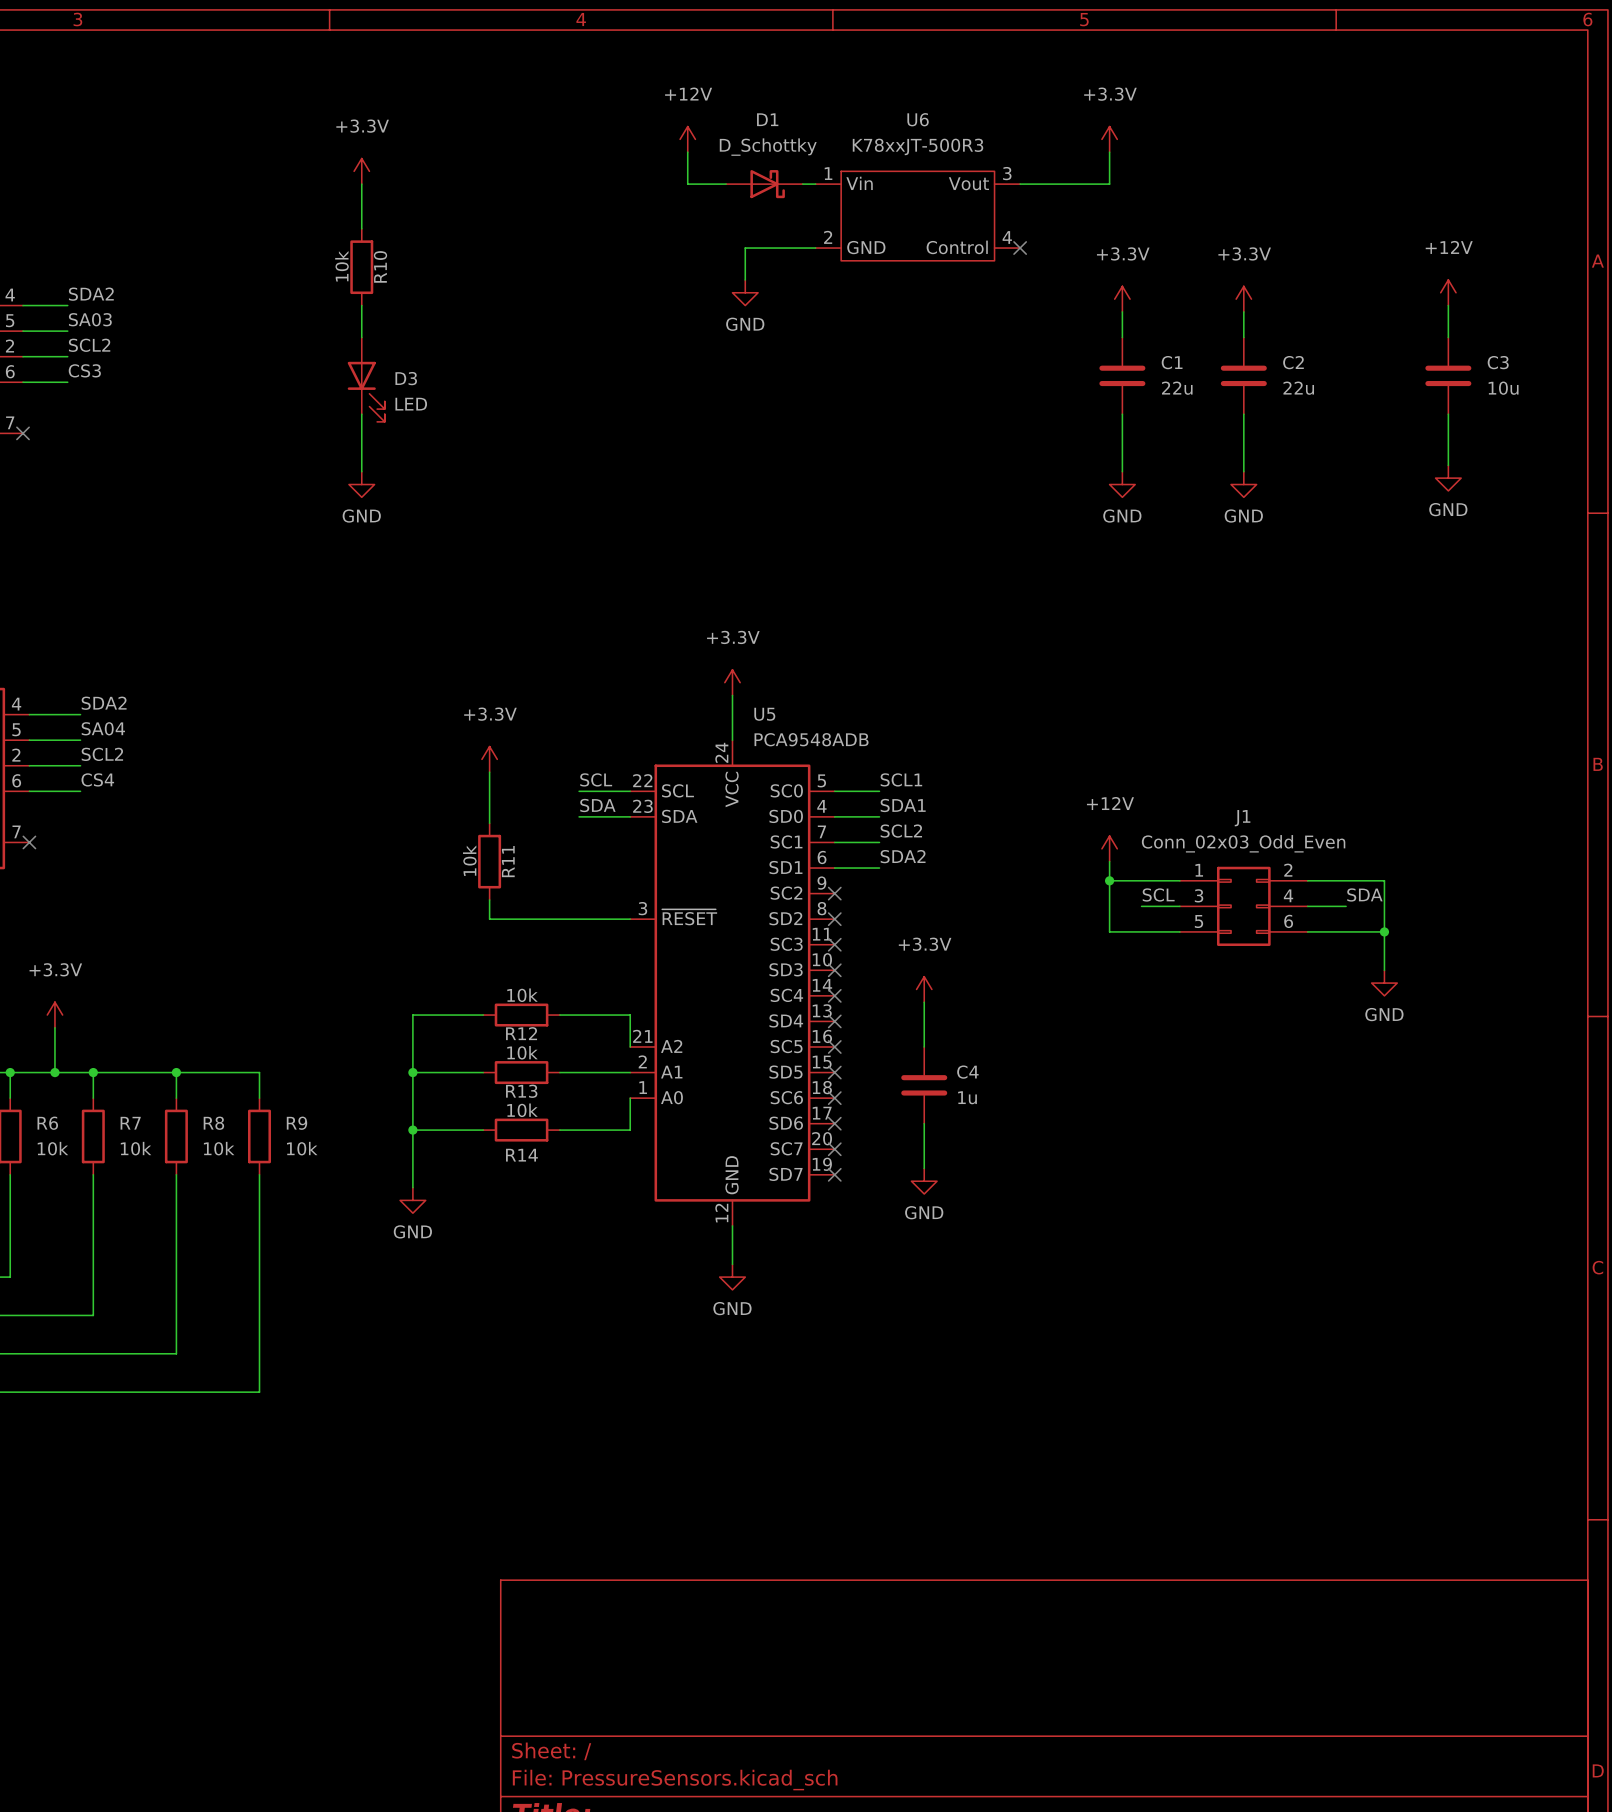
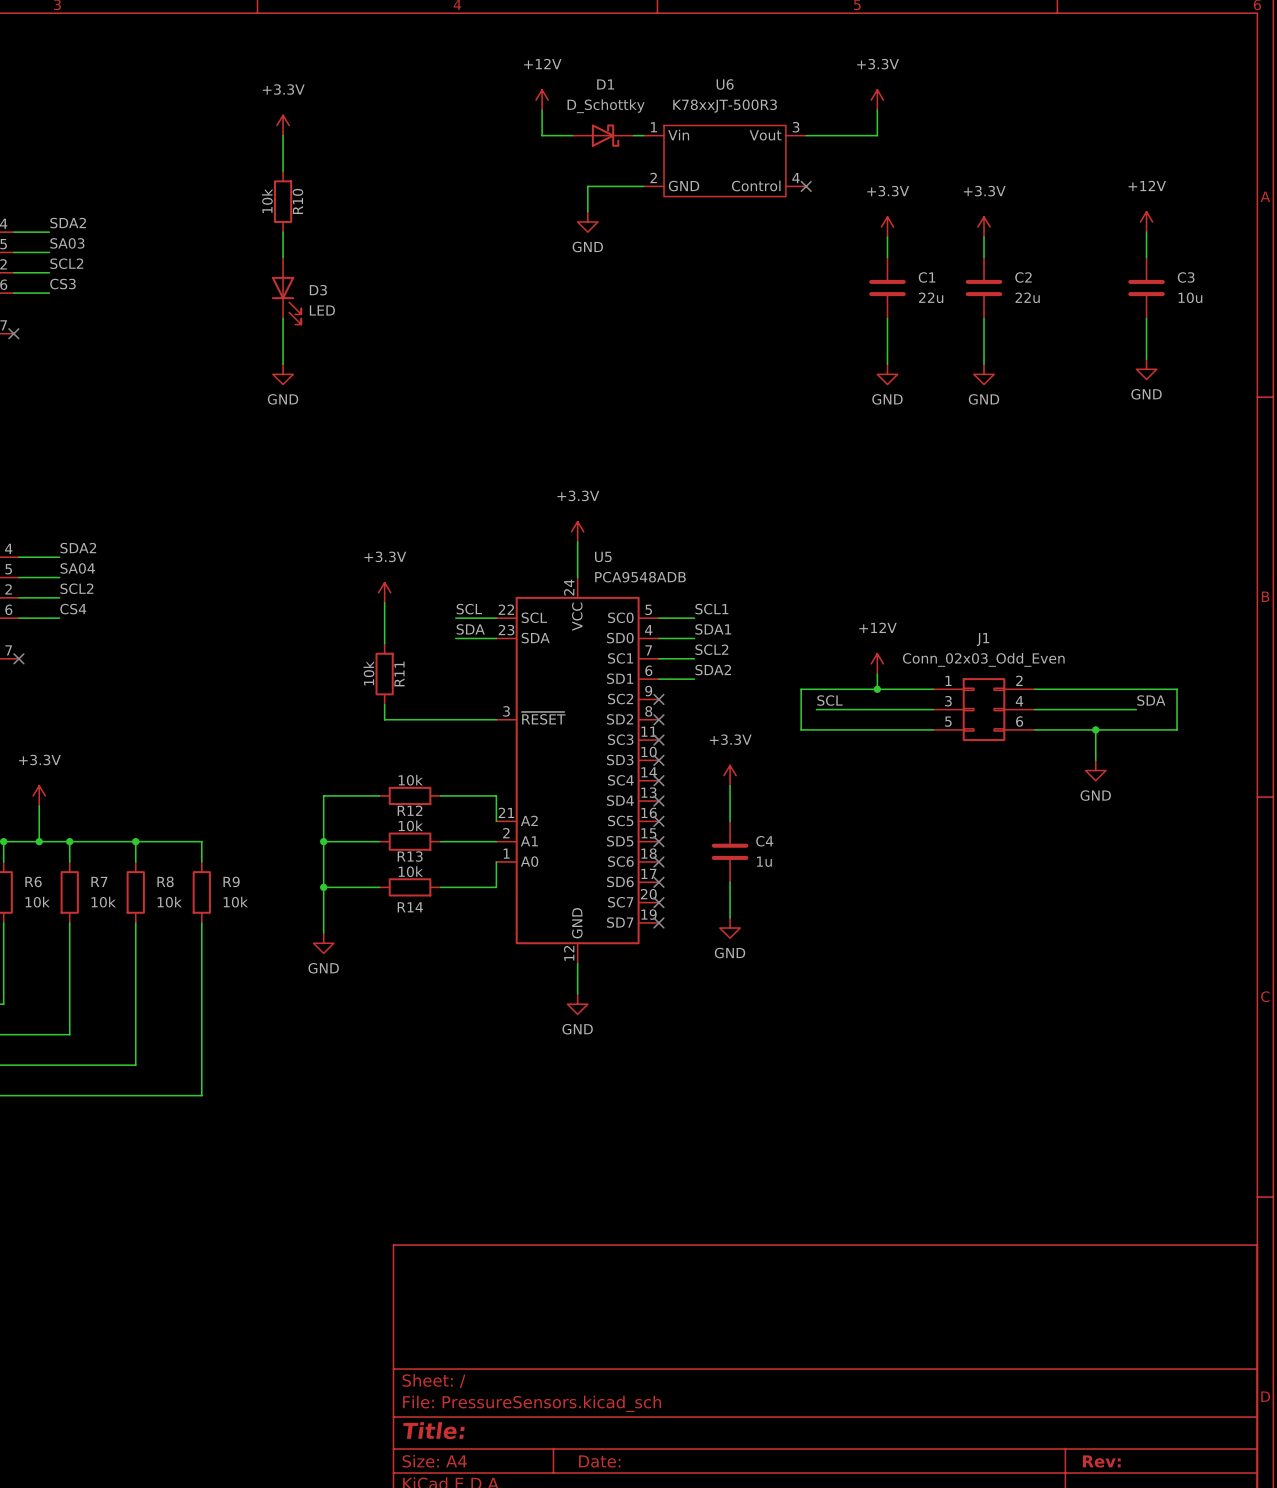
wire: (1109, 880) (1109, 931) -> (877, 689) (801, 689) (801, 729) (877, 729)
wire: (1384, 880) (1384, 931) -> (1095, 689) (1177, 689) (1177, 729) (1095, 729)
label position: SCL (1158, 894) -> SCL (829, 700)
label position: SDA (1364, 894) -> SDA (1151, 700)
wire: none -> (816, 709) (902, 709)
wire: none -> (1065, 709) (1136, 709)

